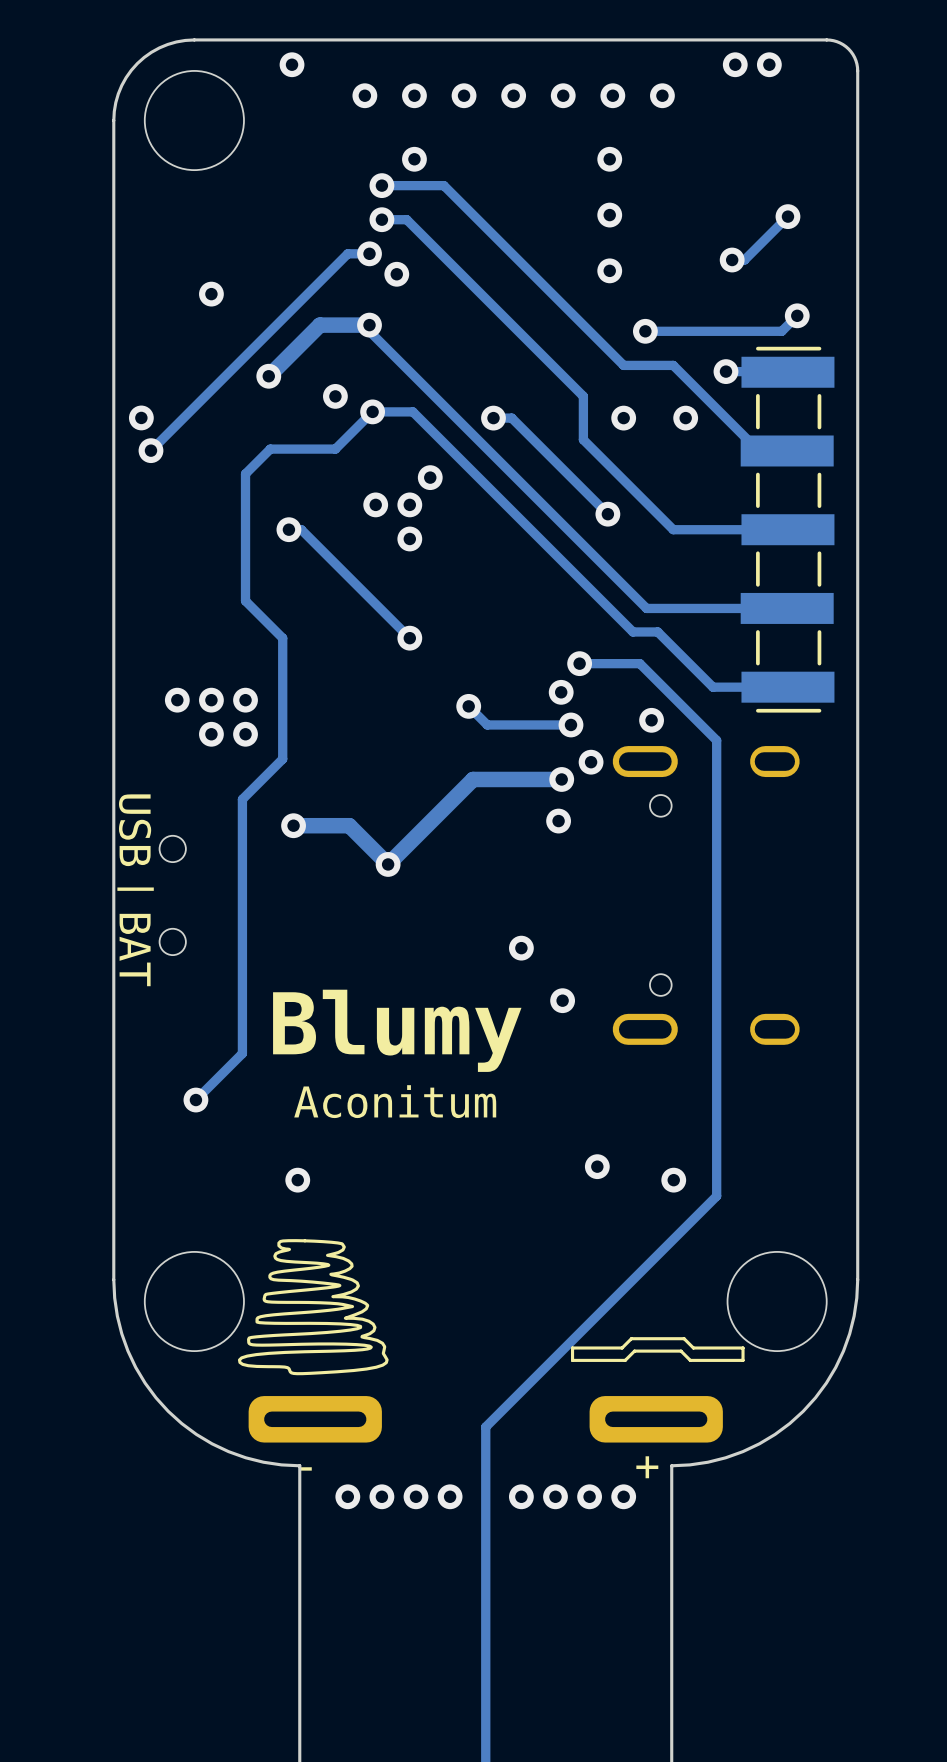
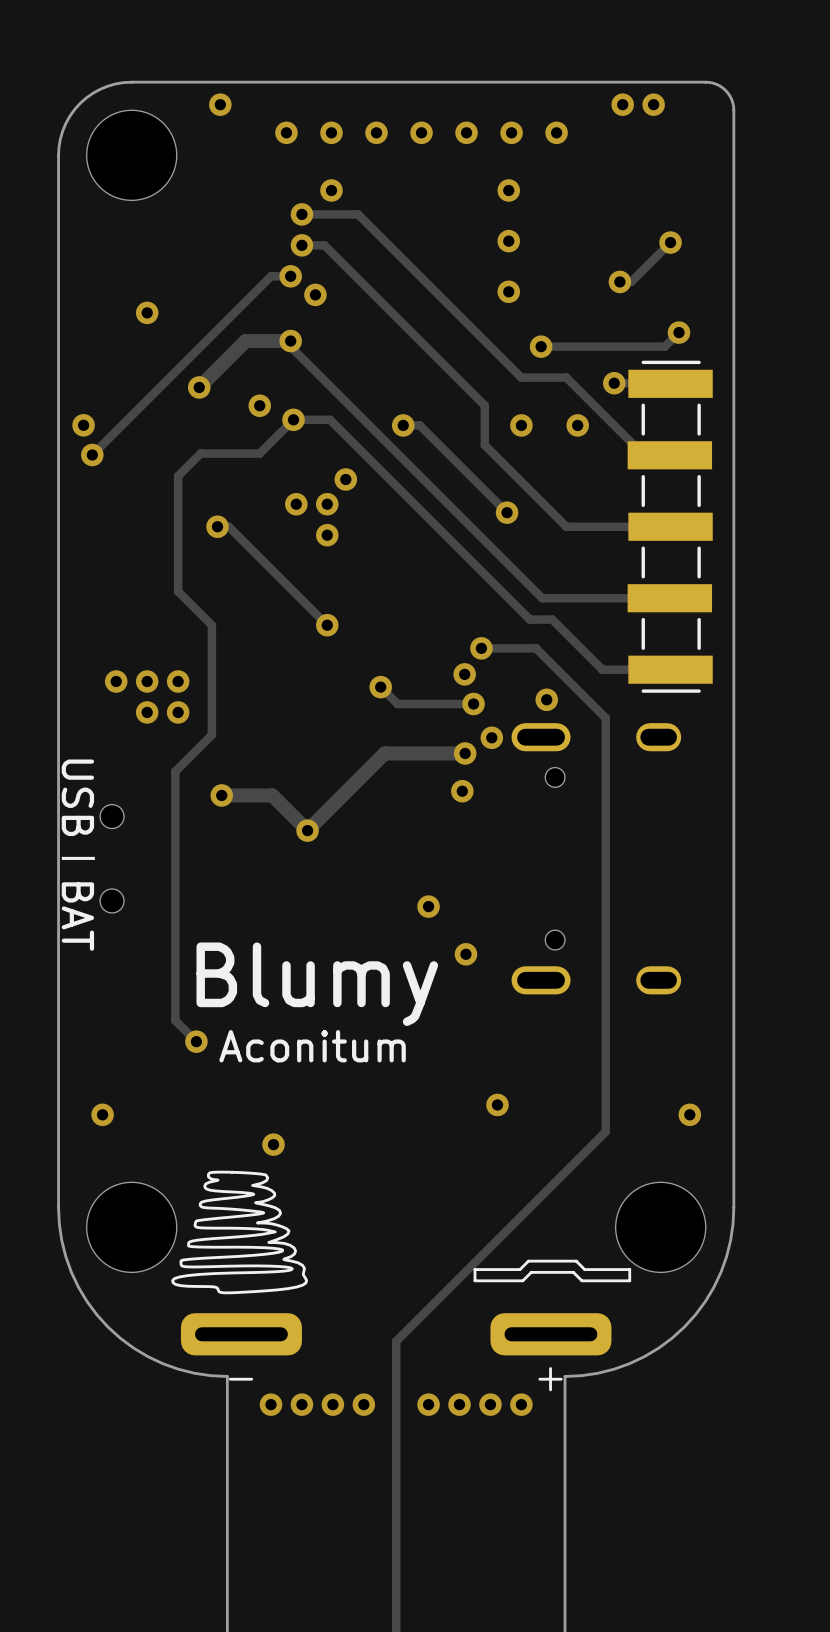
track: (242, 1053) (195, 1100) -> (175, 1002) (175, 1020) (196, 1041)
via: none -> (196, 1041)
via: (195, 1100) -> none
via: none -> (102, 1114)
via: (297, 1180) -> none
via position: (673, 1180) -> (689, 1114)
via: none -> (273, 1144)

